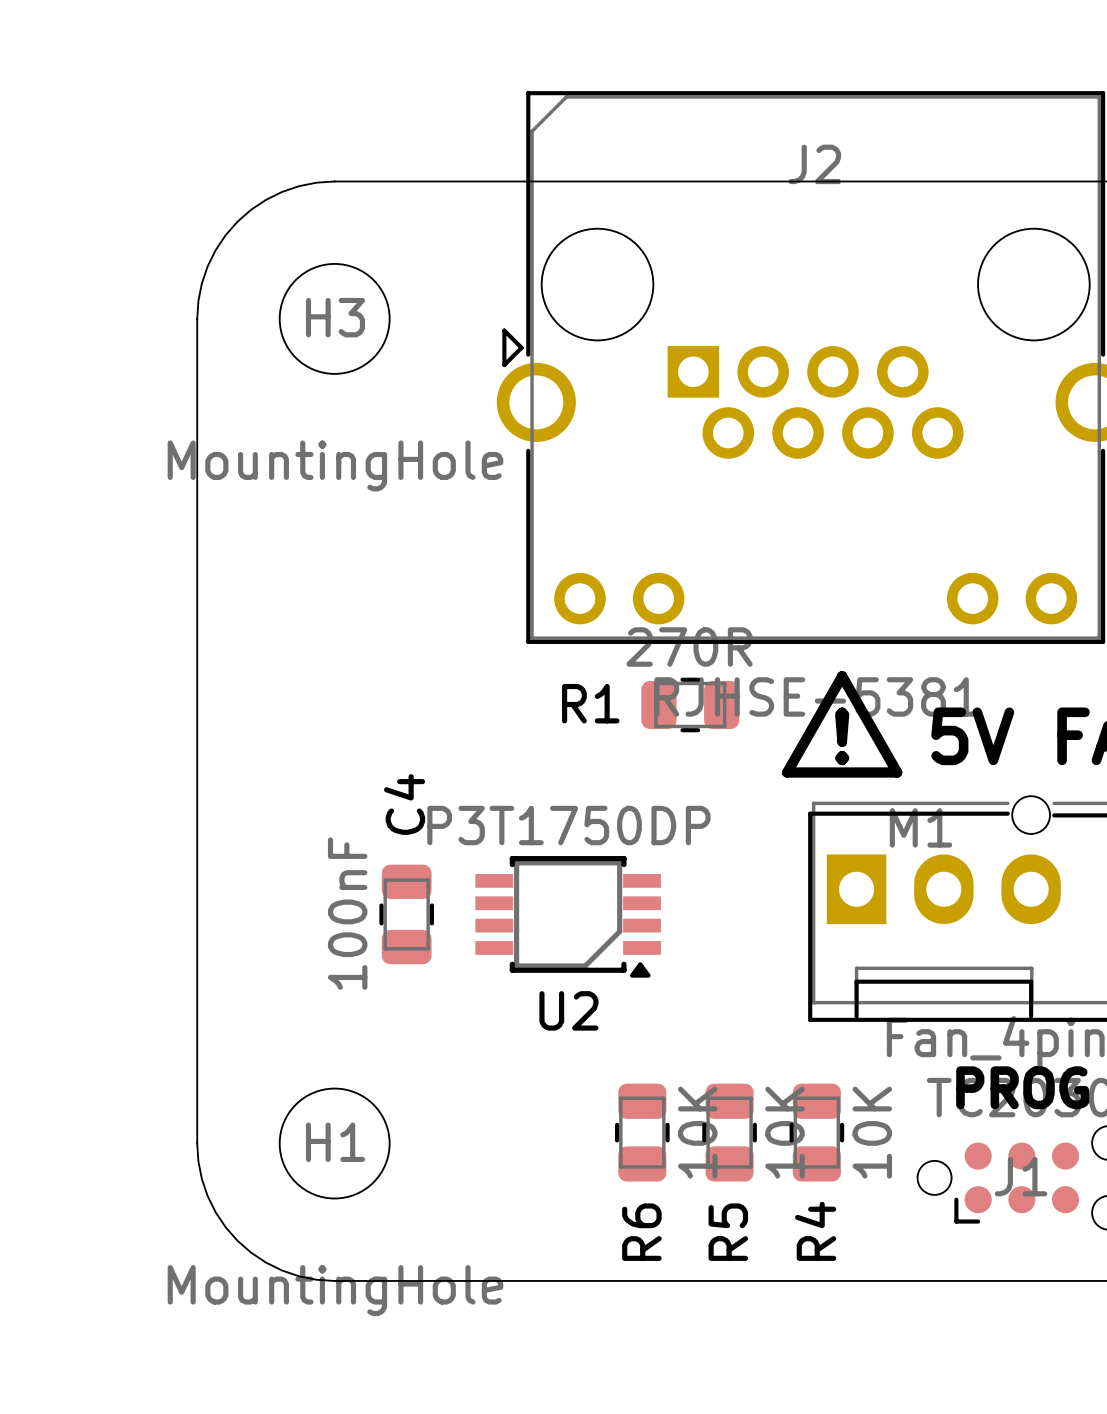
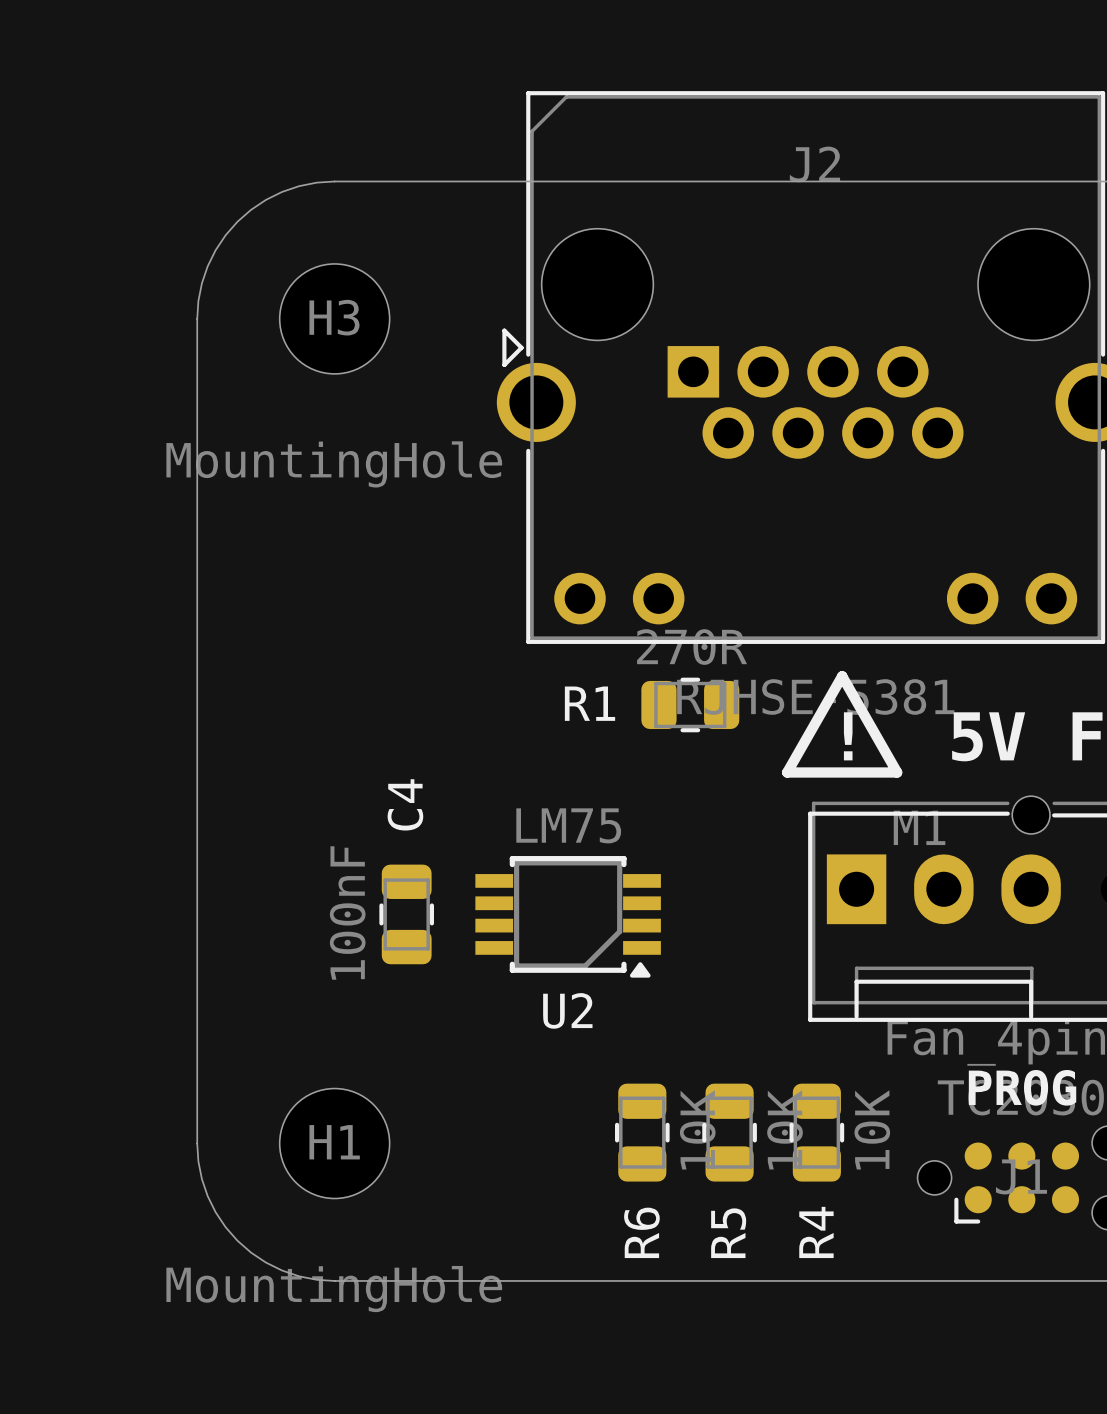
U2 value: P3T1750DP (568, 825) -> LM75 (568, 825)

